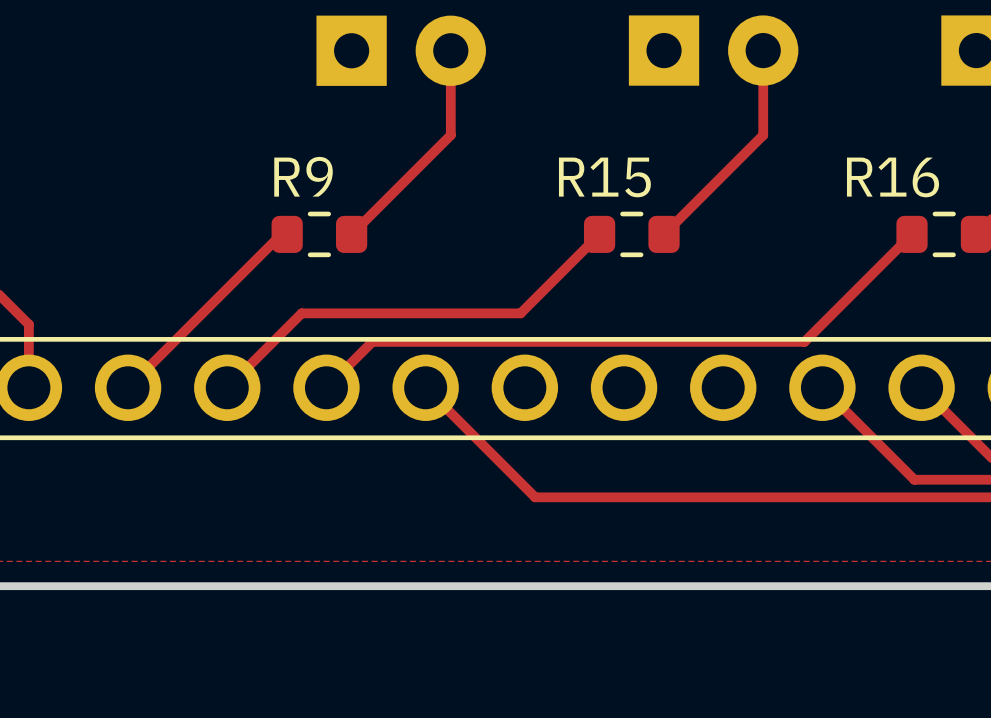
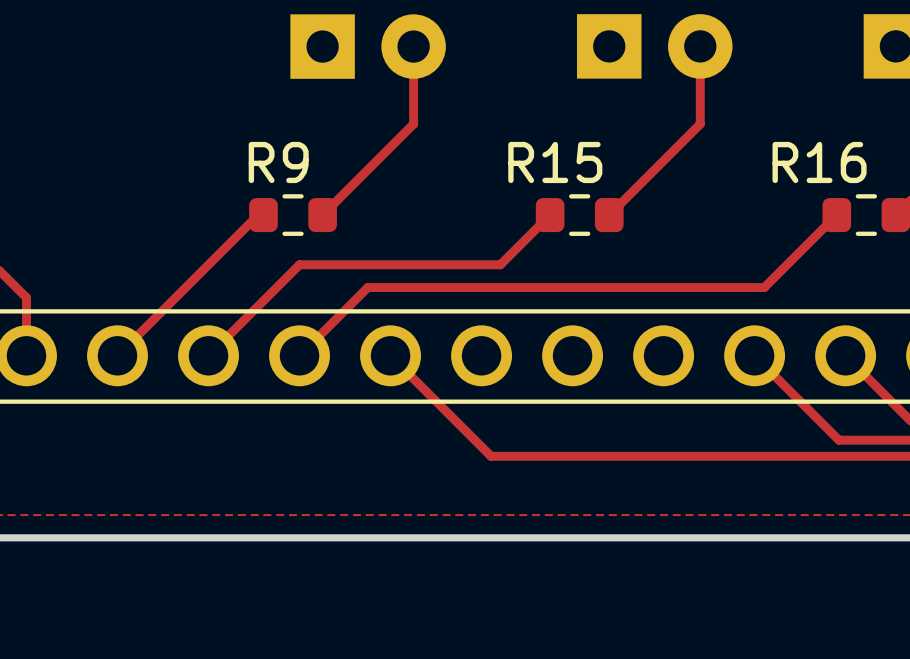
track: (545, 288) (520, 313) -> (500, 264) (299, 264) (276, 287)
track: (301, 313) (400, 313) -> (341, 313) (367, 287)
track: (833, 313) (804, 341) (372, 341) -> (764, 287) (477, 287)

